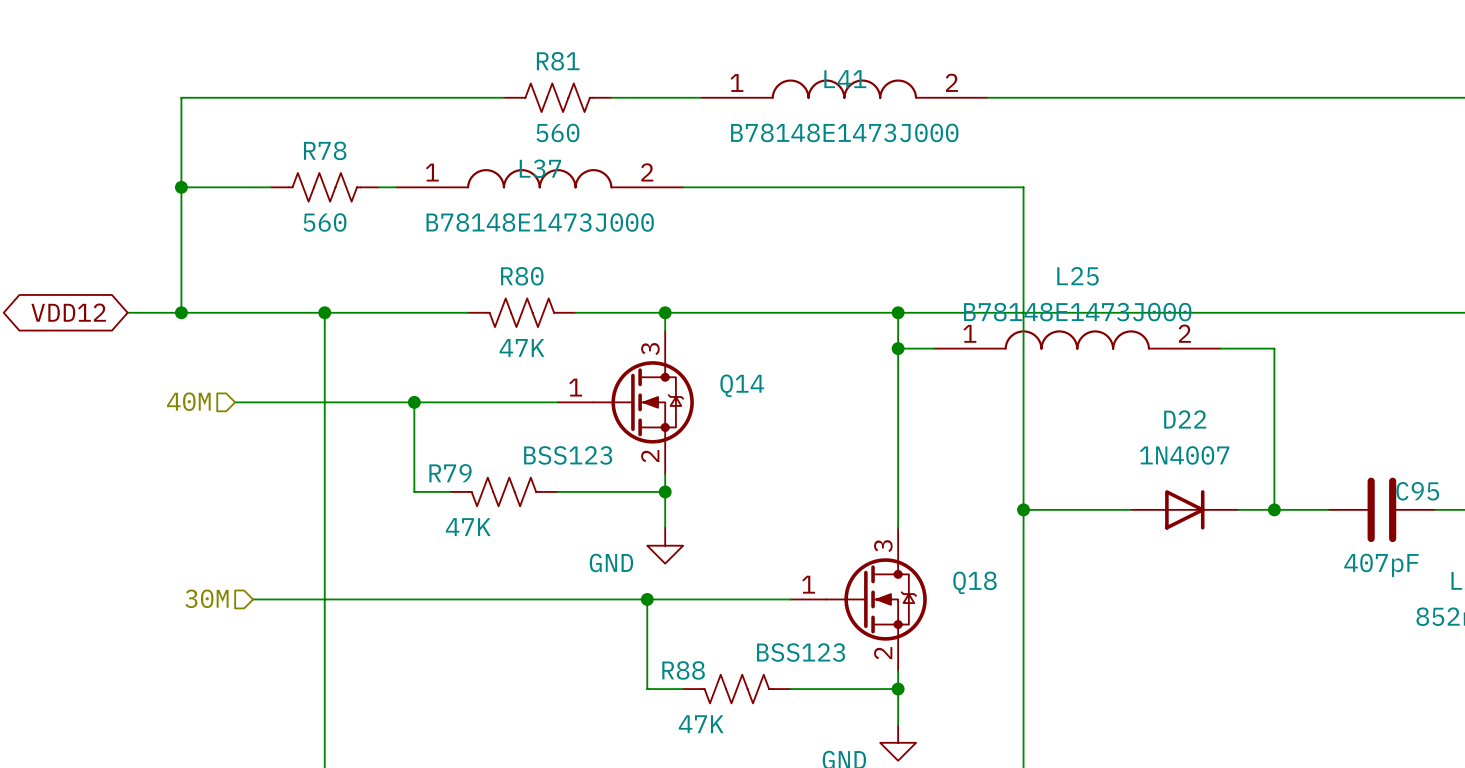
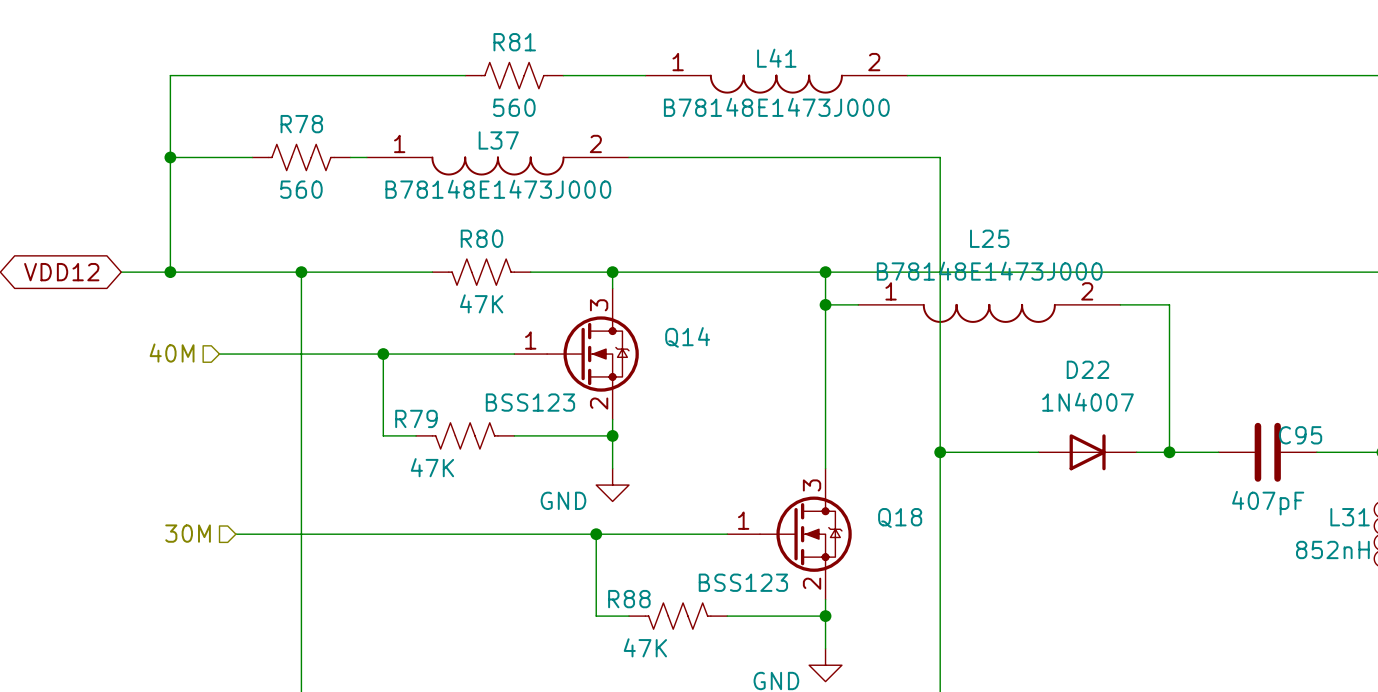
L41 symbol: [701, 79, 988, 99] -> [645, 74, 908, 94]
L37 symbol: [396, 169, 684, 189] -> [366, 156, 629, 176]
L25 symbol: [933, 330, 1221, 350] -> [858, 303, 1121, 323]

